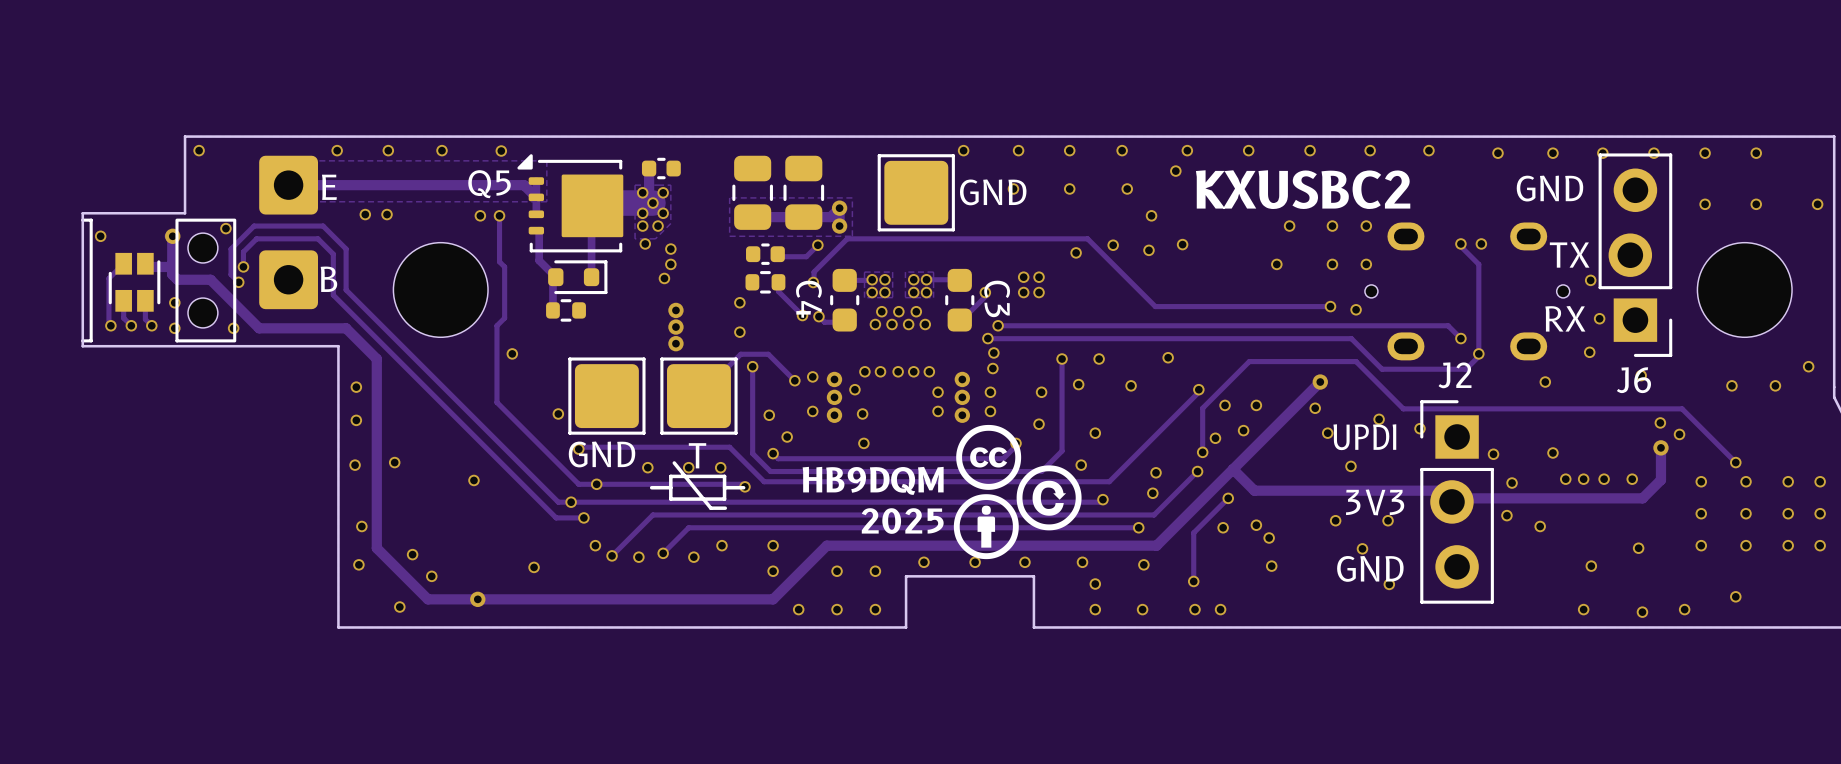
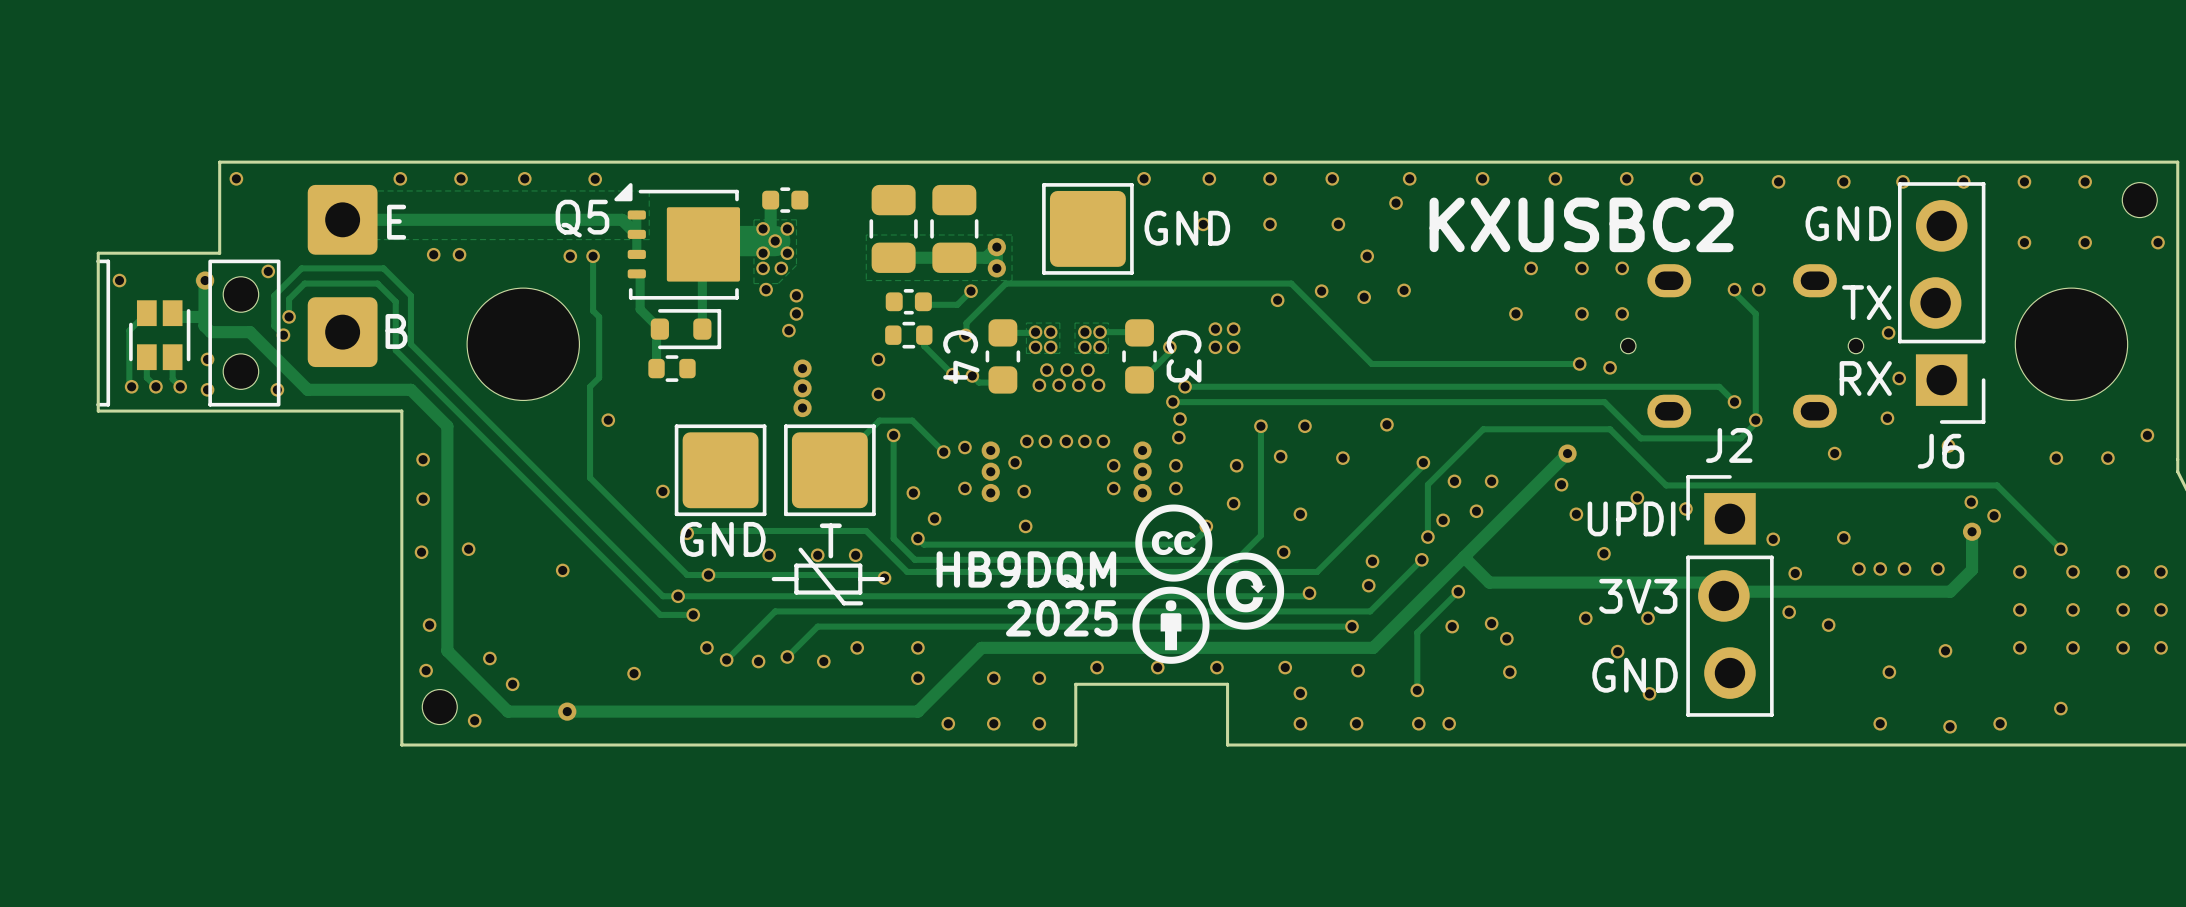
part: none -> (2139, 200)
part: none -> (439, 707)

